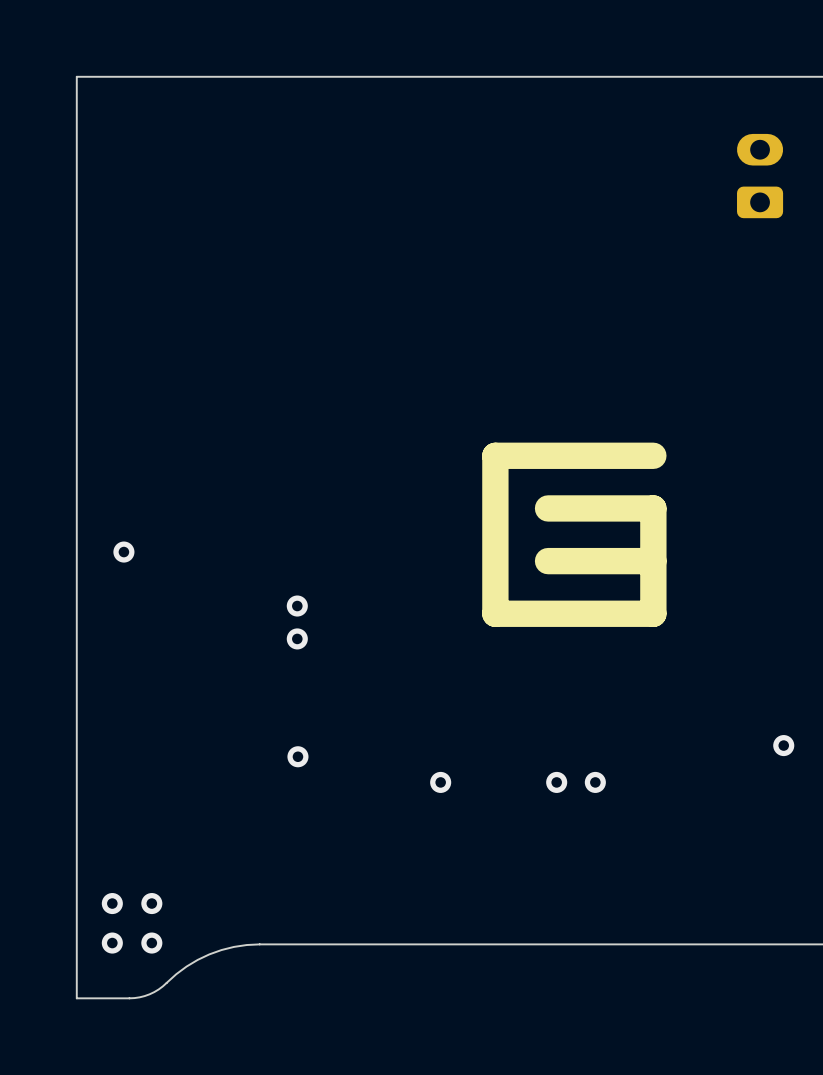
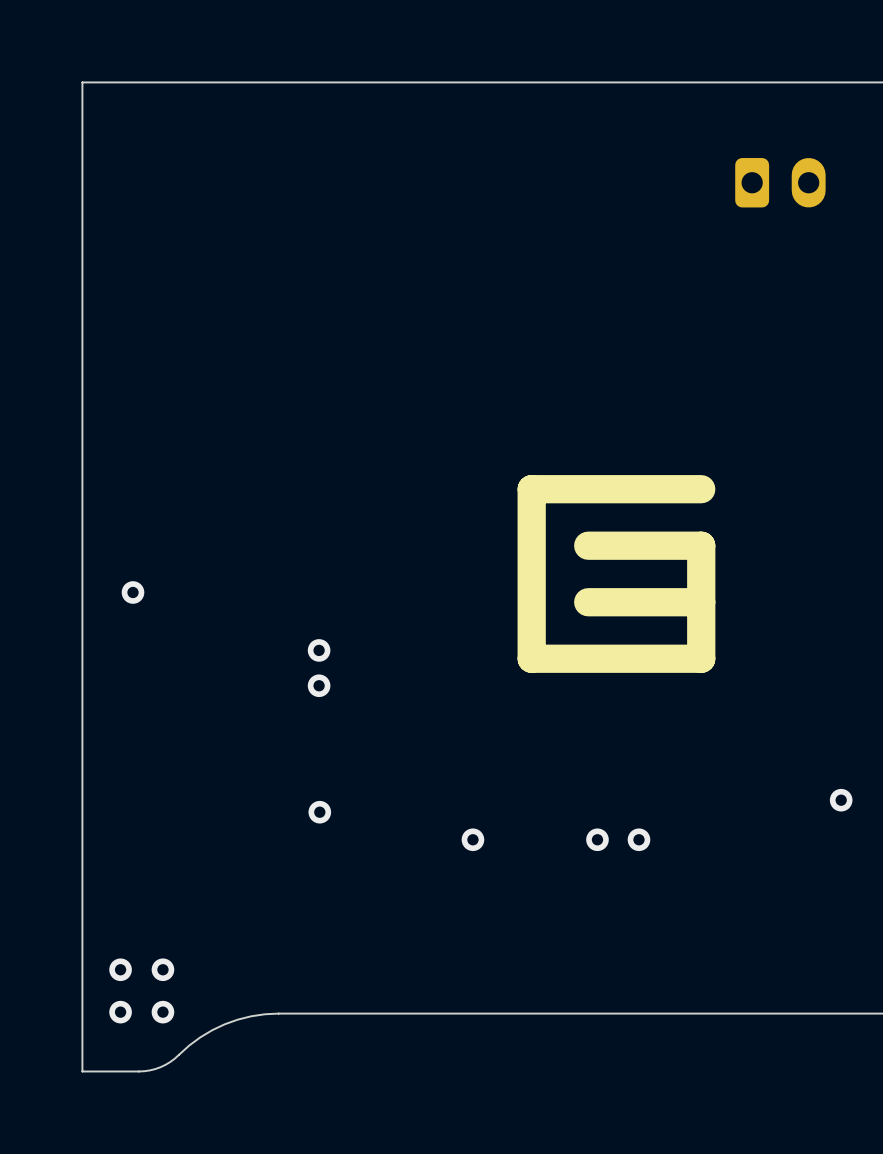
part rotation: 0° (760, 176) -> 90° clockwise (780, 182)

